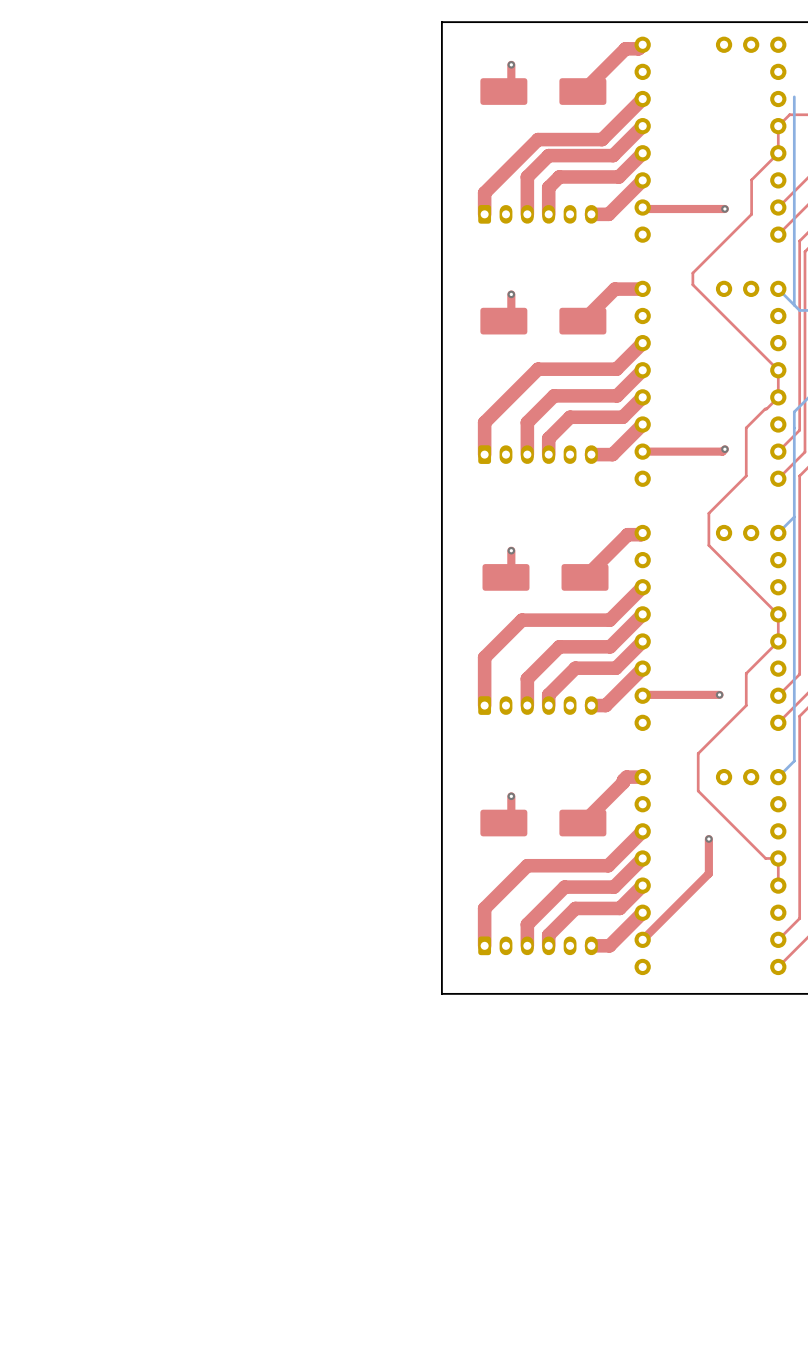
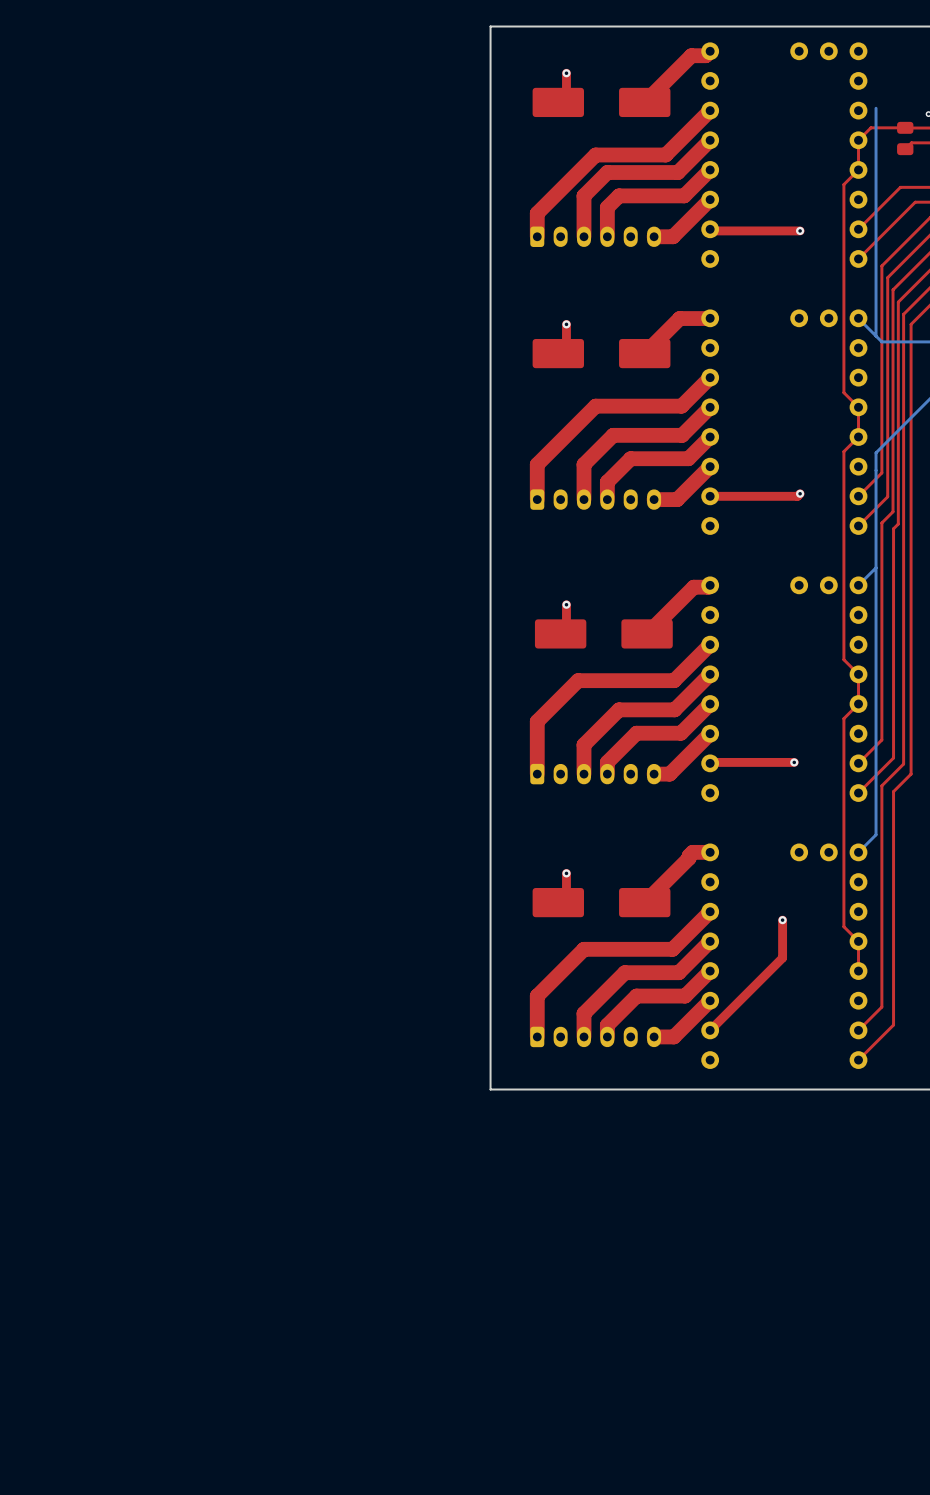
top track: (764, 166) (751, 179) (751, 214) (692, 273) (692, 284) (764, 356) -> (843, 184) (843, 392)
top track: (766, 409) (746, 427) (746, 475) (708, 513) (708, 545) (777, 614) -> (845, 449) (843, 451) (843, 659) (858, 674)
top track: (764, 654) (746, 673) (746, 705) (698, 753) (698, 790) (765, 858) (778, 858) -> (843, 718) (843, 926) (858, 941)

